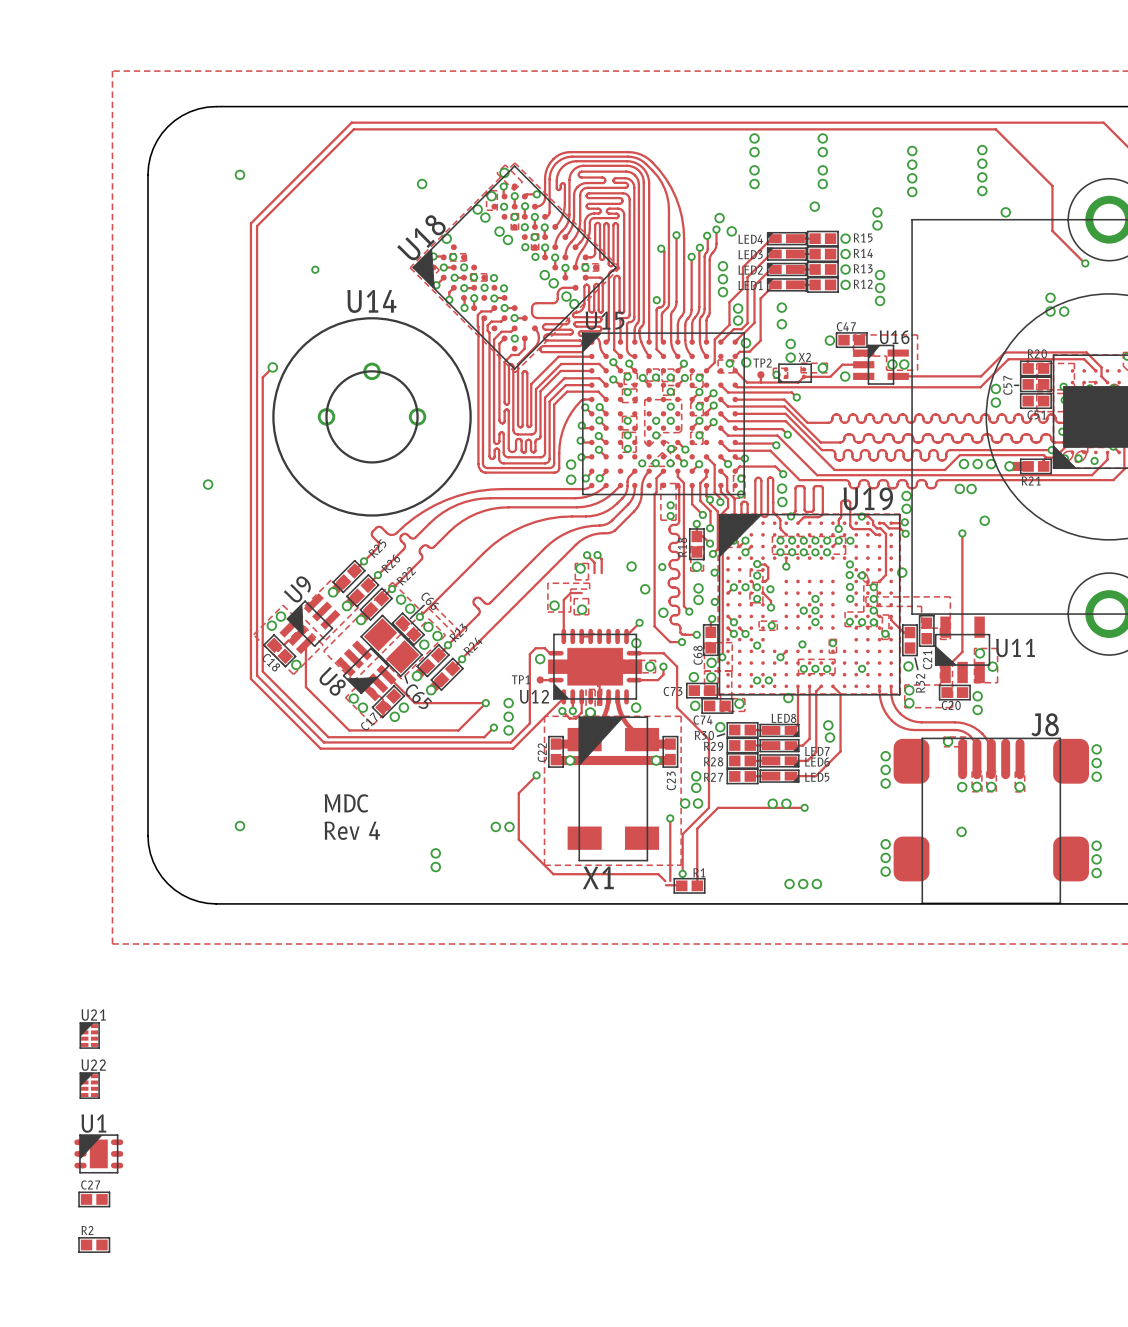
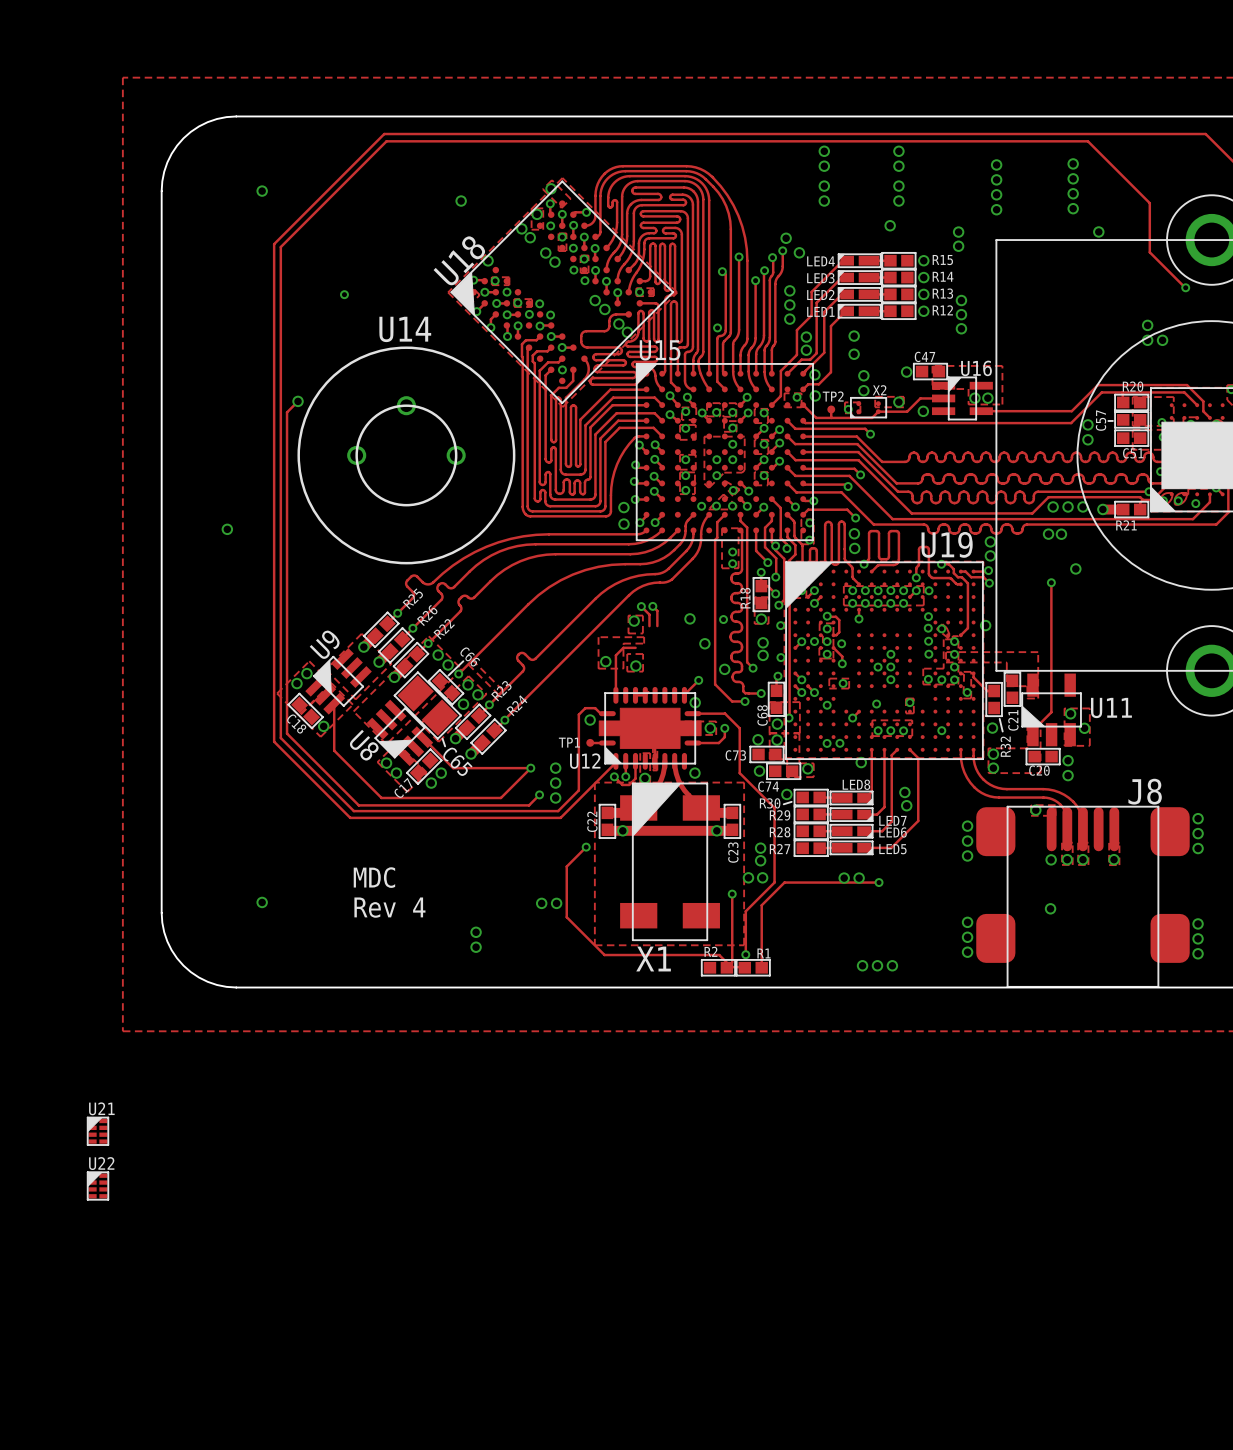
U1: (98, 1153) -> none
C27: (94, 1199) -> none
R2 position: (94, 1244) -> (718, 967)

